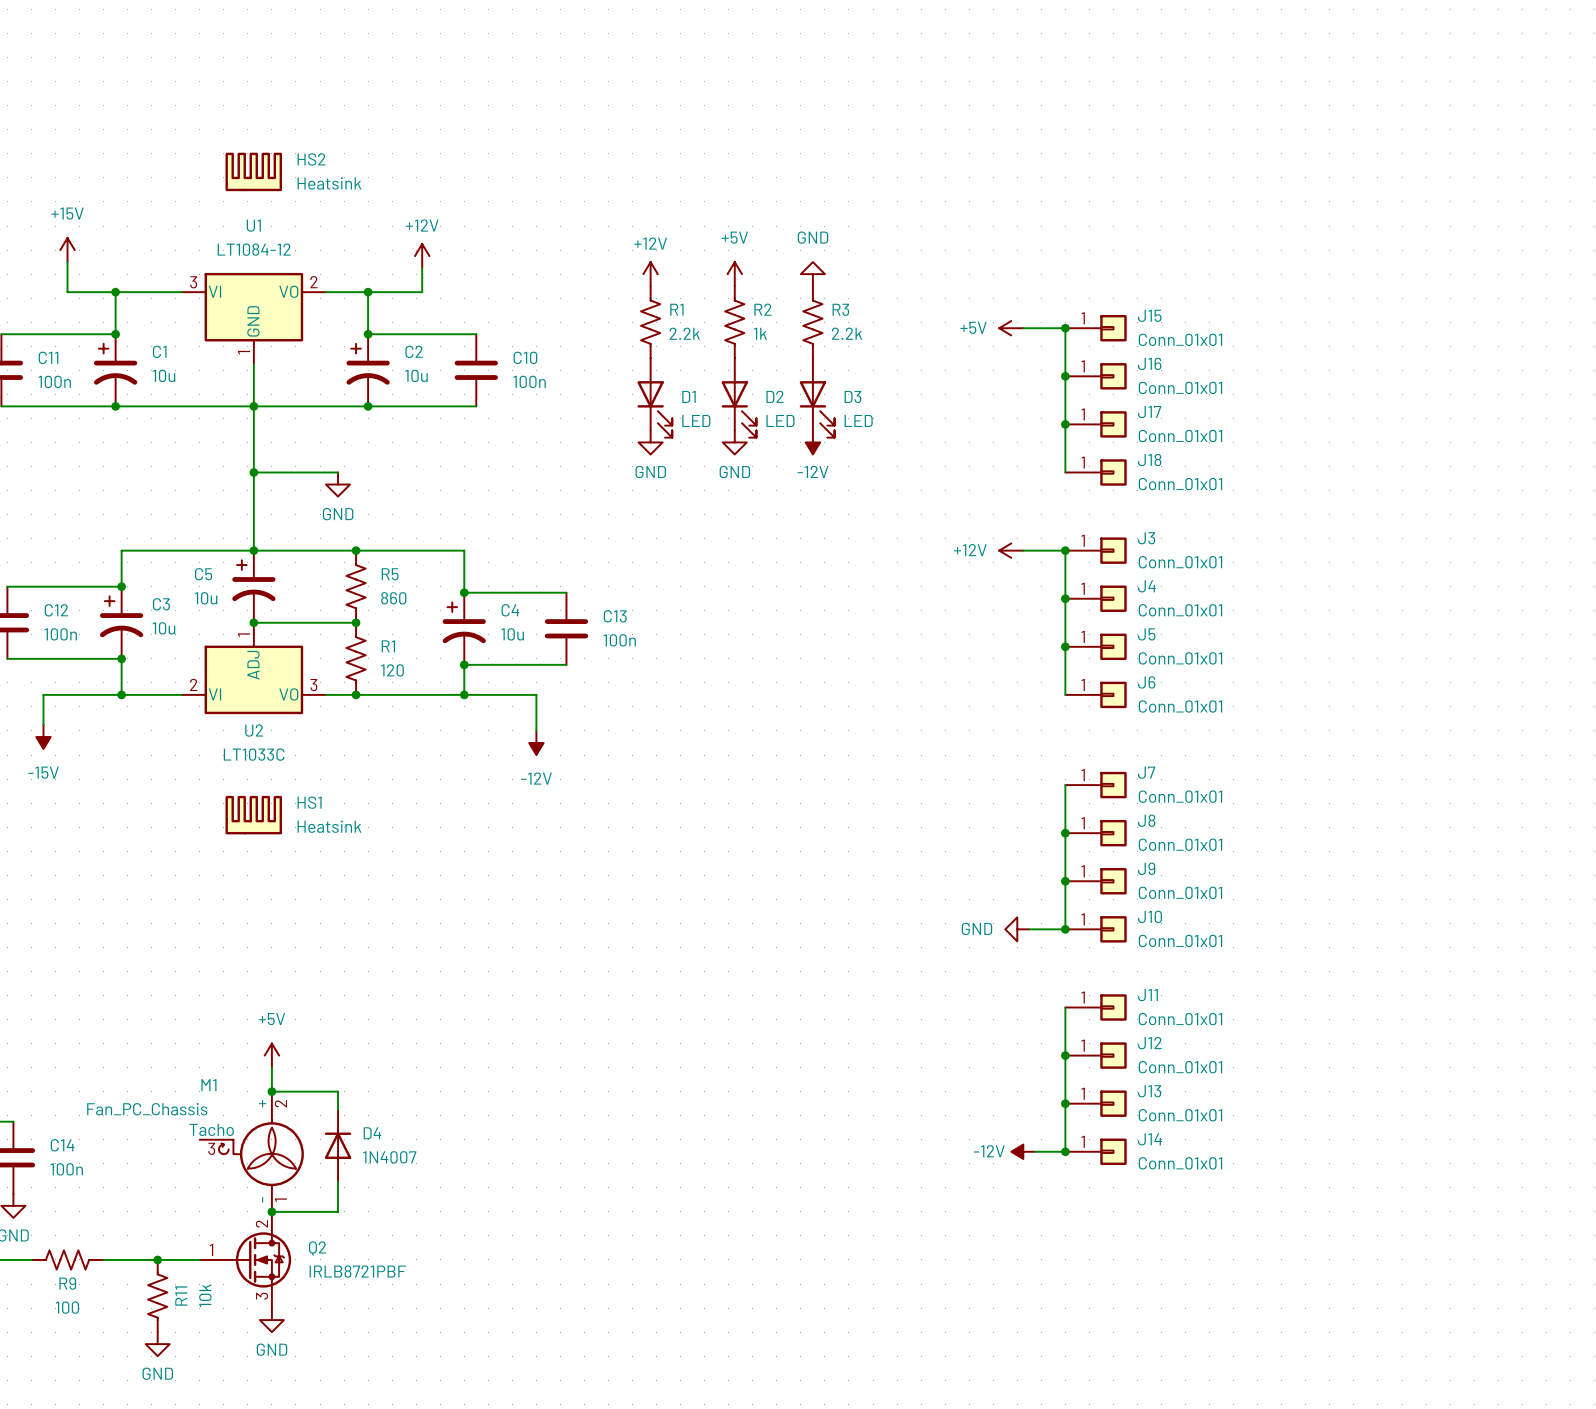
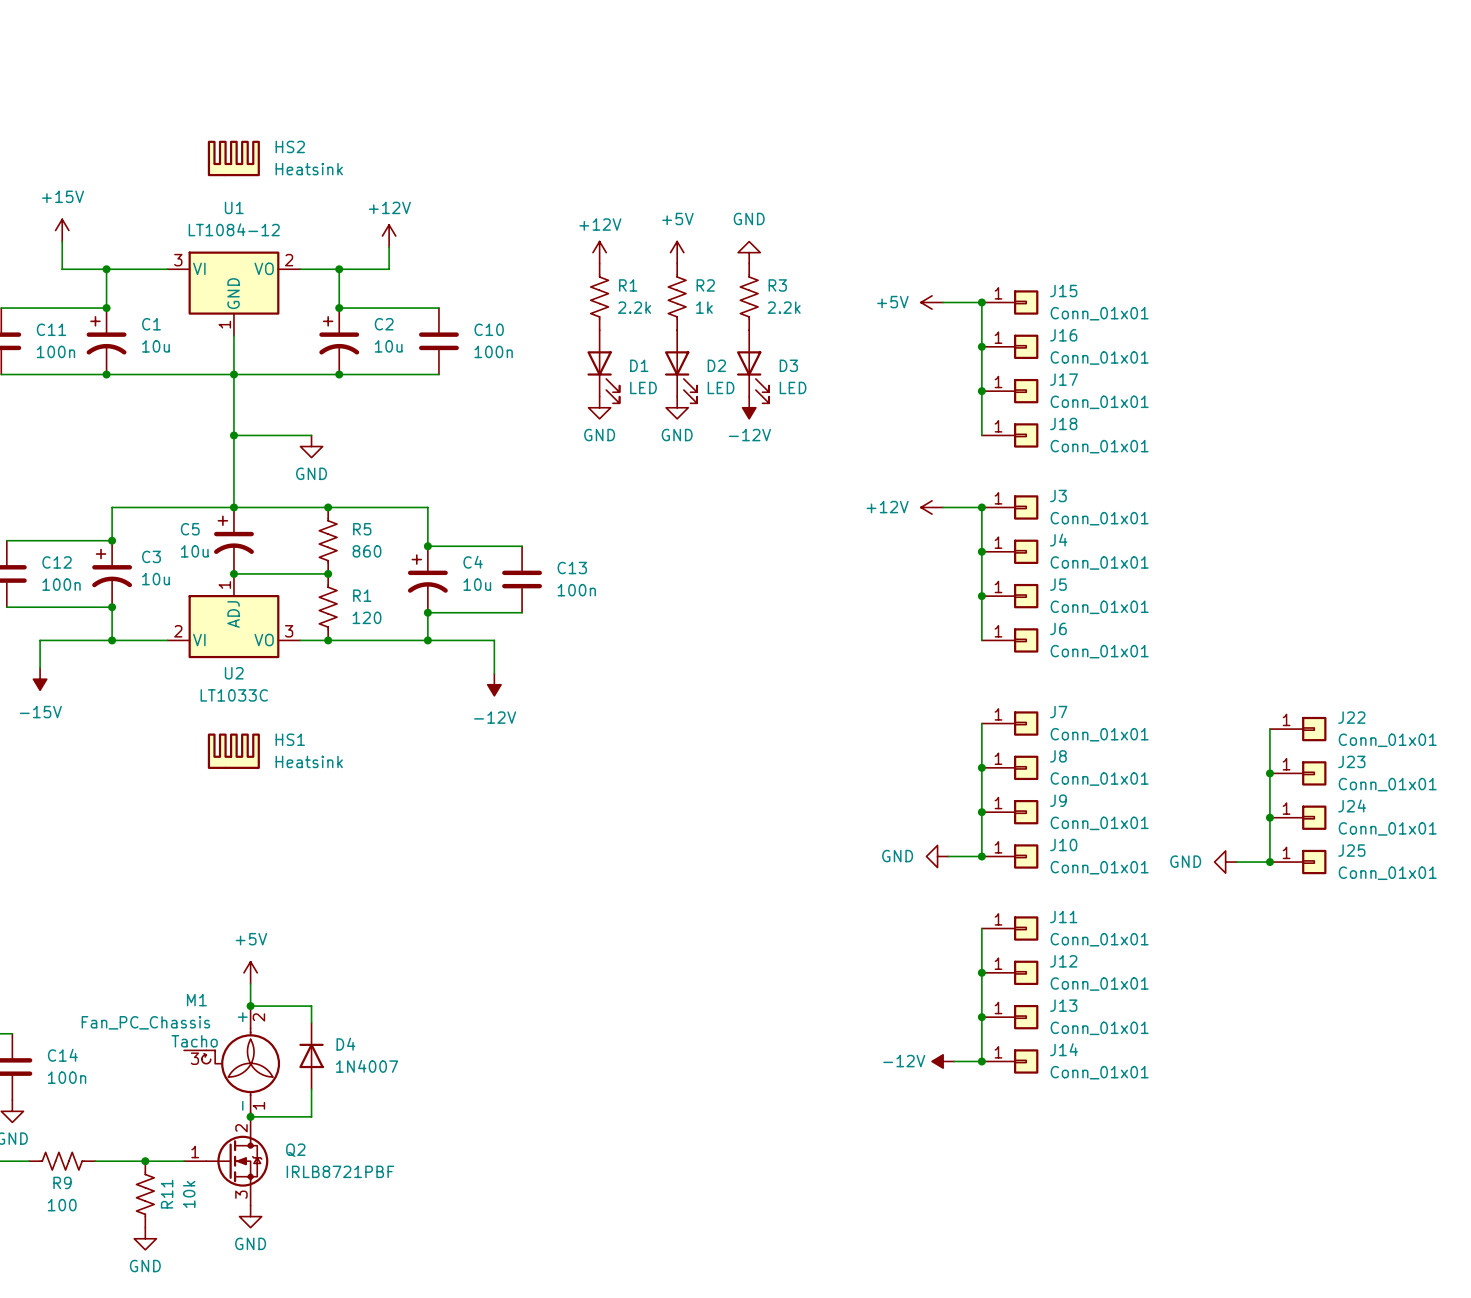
wire: none -> (1269, 729) (1269, 862) (1236, 862)
J22: none -> Conn_01x01 (1298, 729)
junction: none -> (1269, 773)
J23: none -> Conn_01x01 (1298, 773)
junction: none -> (1269, 817)
J24: none -> Conn_01x01 (1298, 817)
power symbol: none -> GND (1225, 862)
junction: none -> (1269, 862)
J25: none -> Conn_01x01 (1298, 862)

